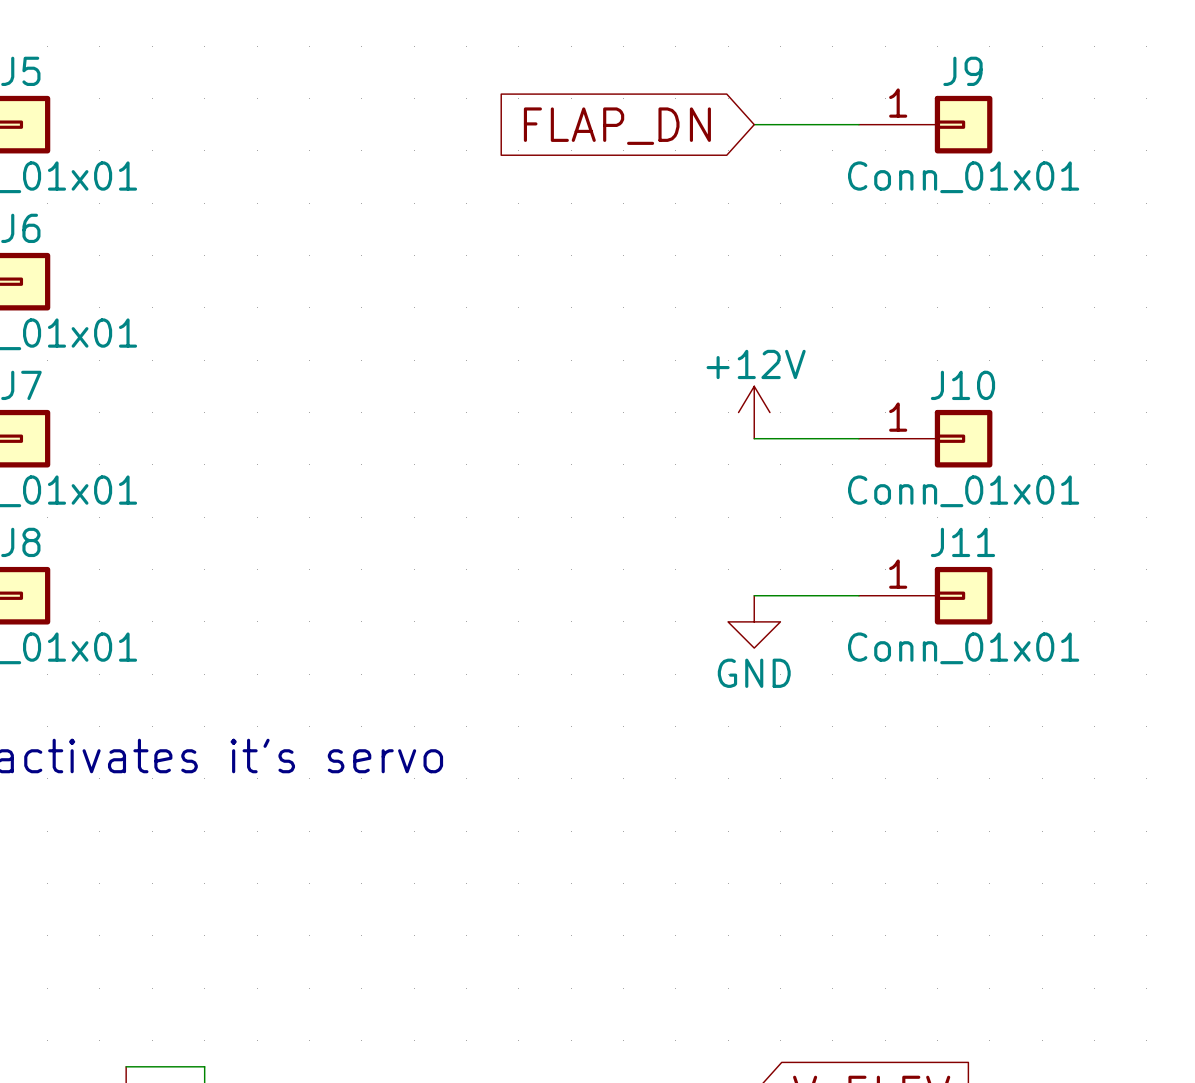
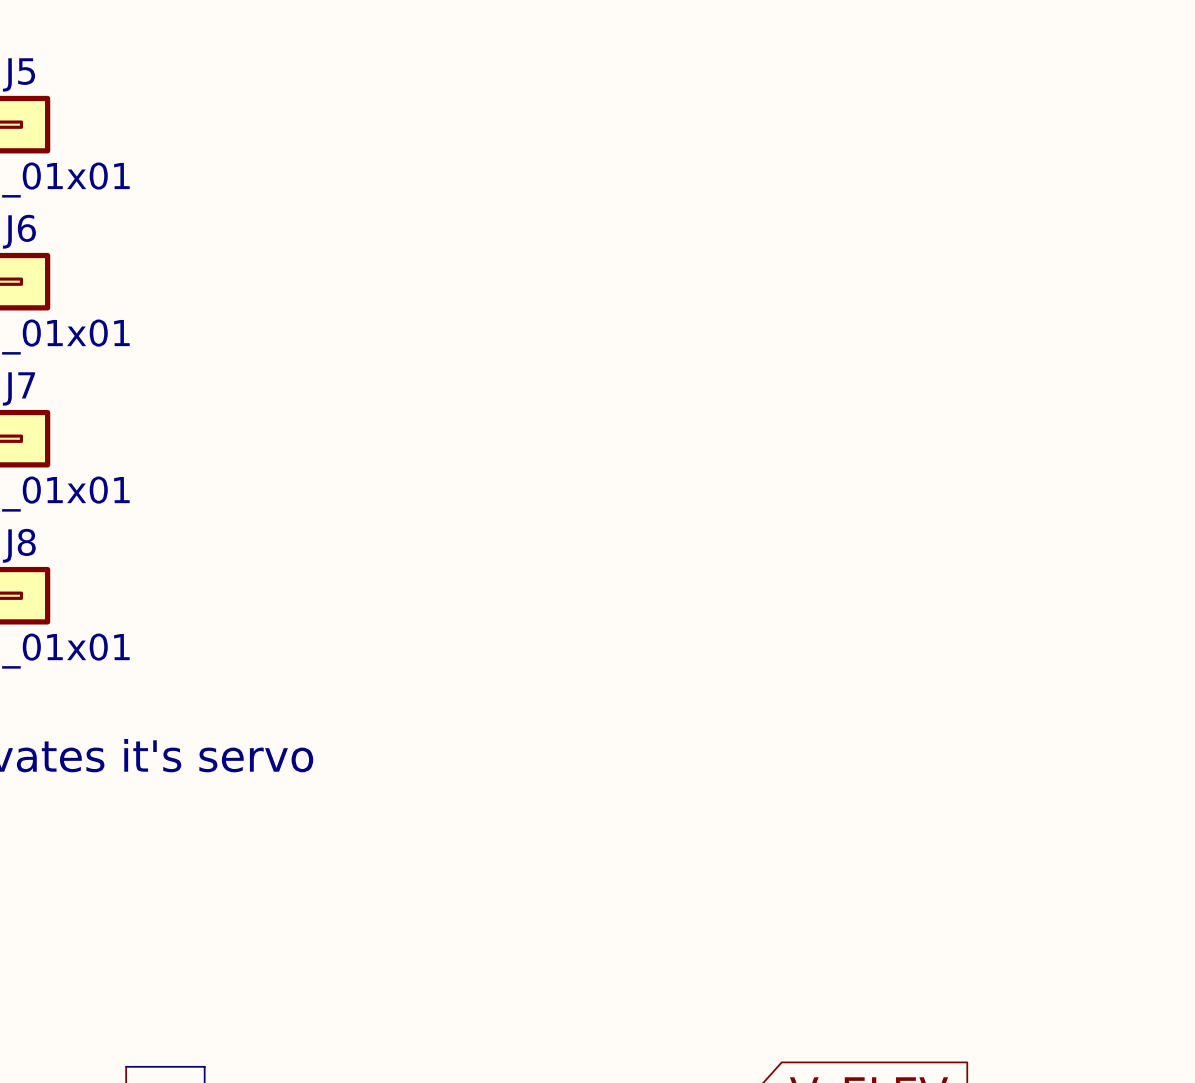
wire: (754, 124) (858, 124) -> none
J9: Conn_01x01 (925, 124) -> none
global label: FLAP_DN (617, 126) -> none
power symbol: +12V (754, 412) -> none
wire: (754, 438) (858, 438) -> none
J10: Conn_01x01 (925, 438) -> none
wire: (754, 595) (858, 595) -> none
J11: Conn_01x01 (925, 595) -> none
power symbol: GND (754, 621) -> none

